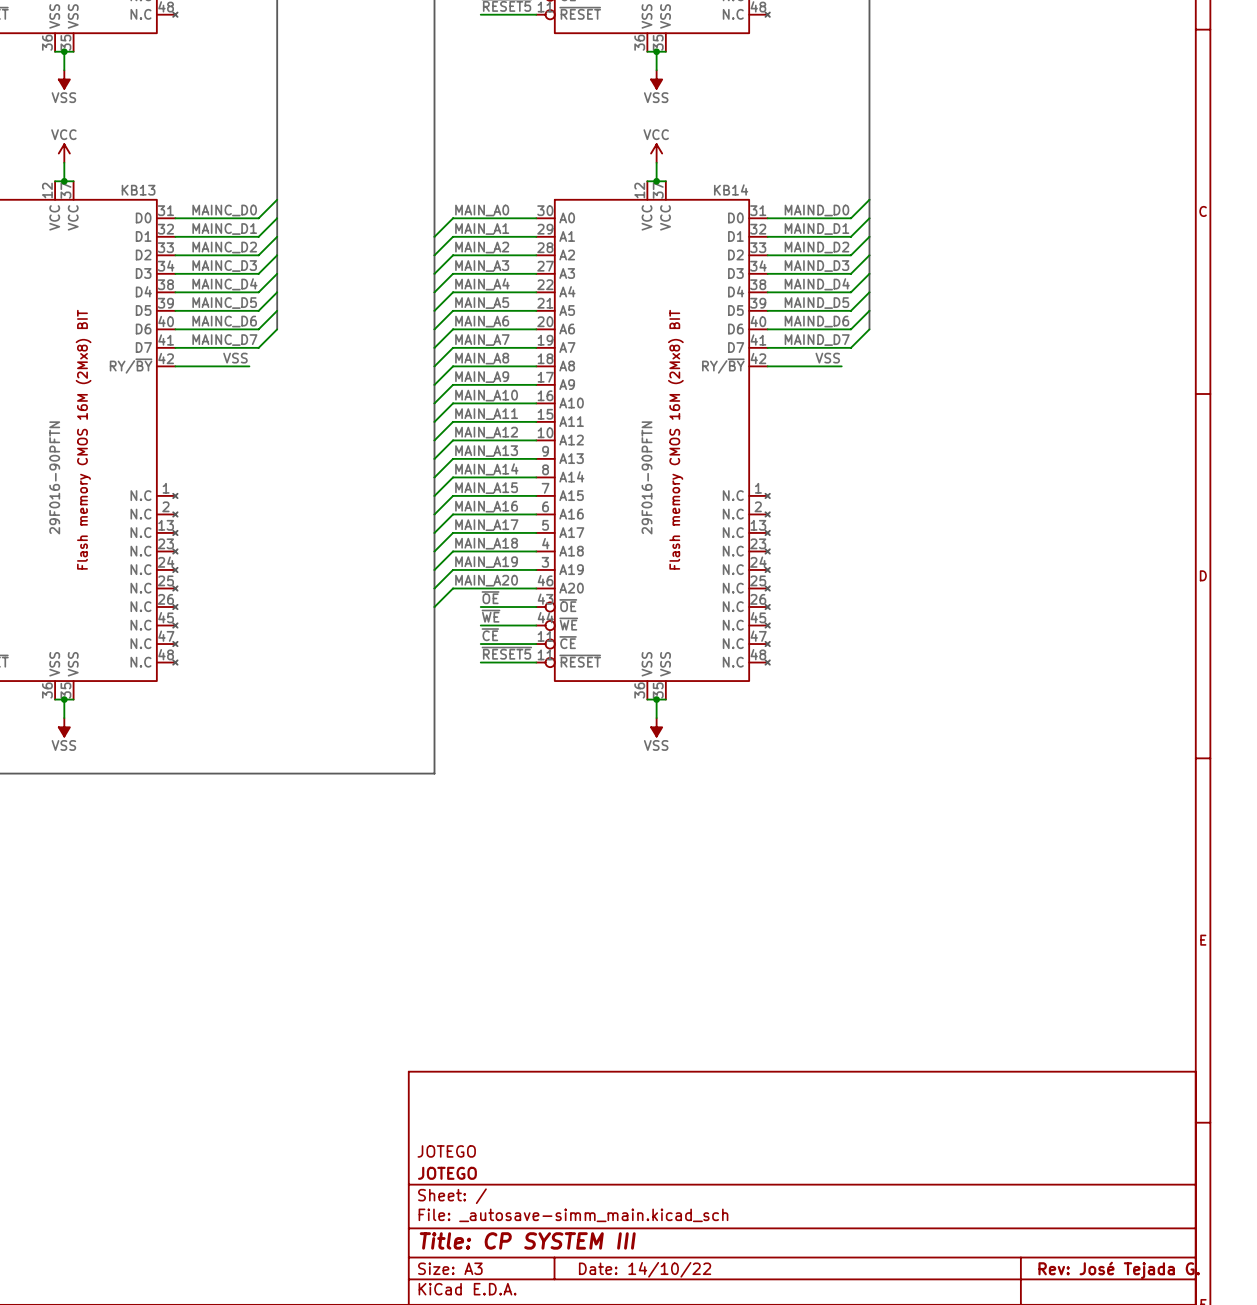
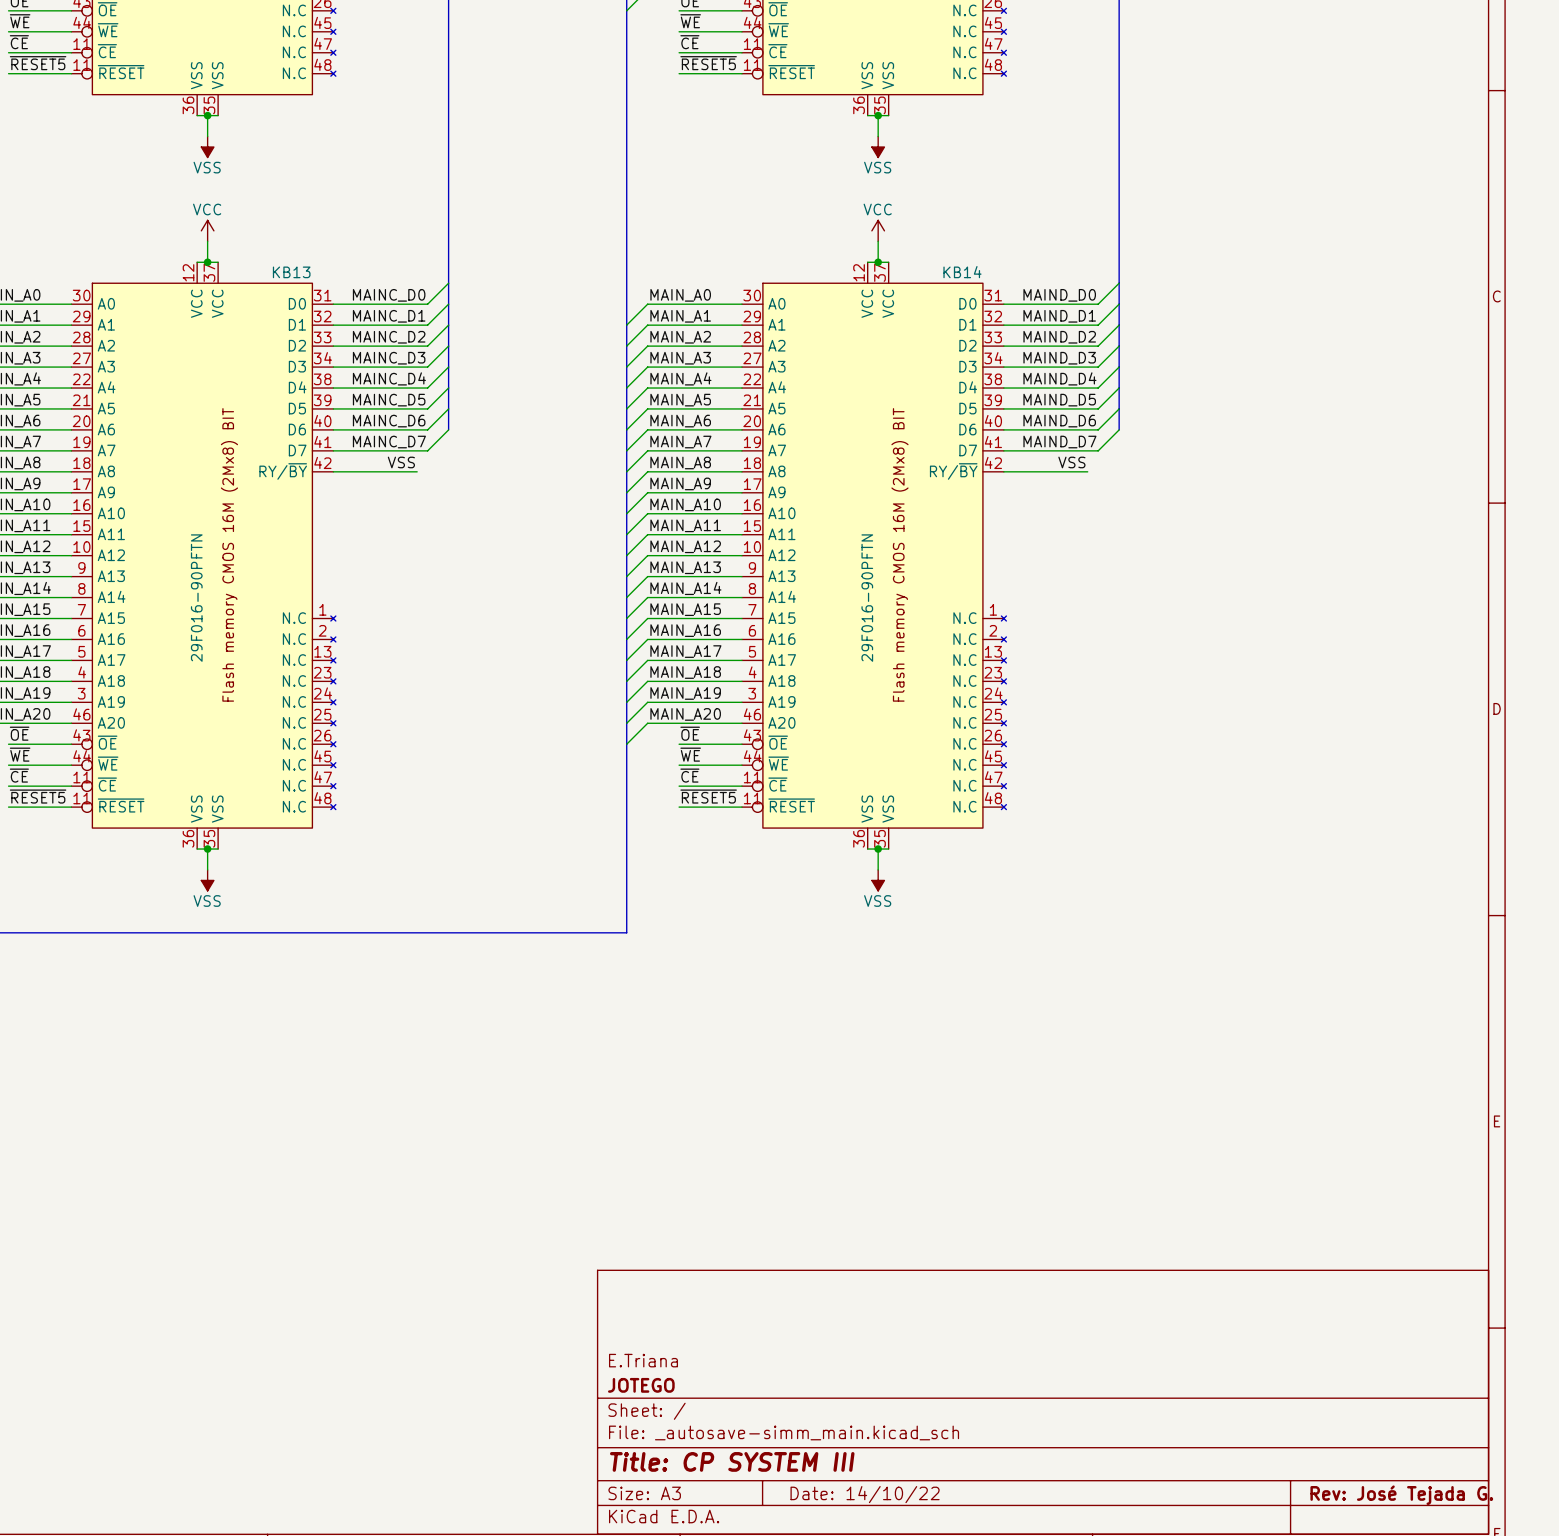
title block: JOTEGO (446, 1151) -> E.Triana (643, 1360)

